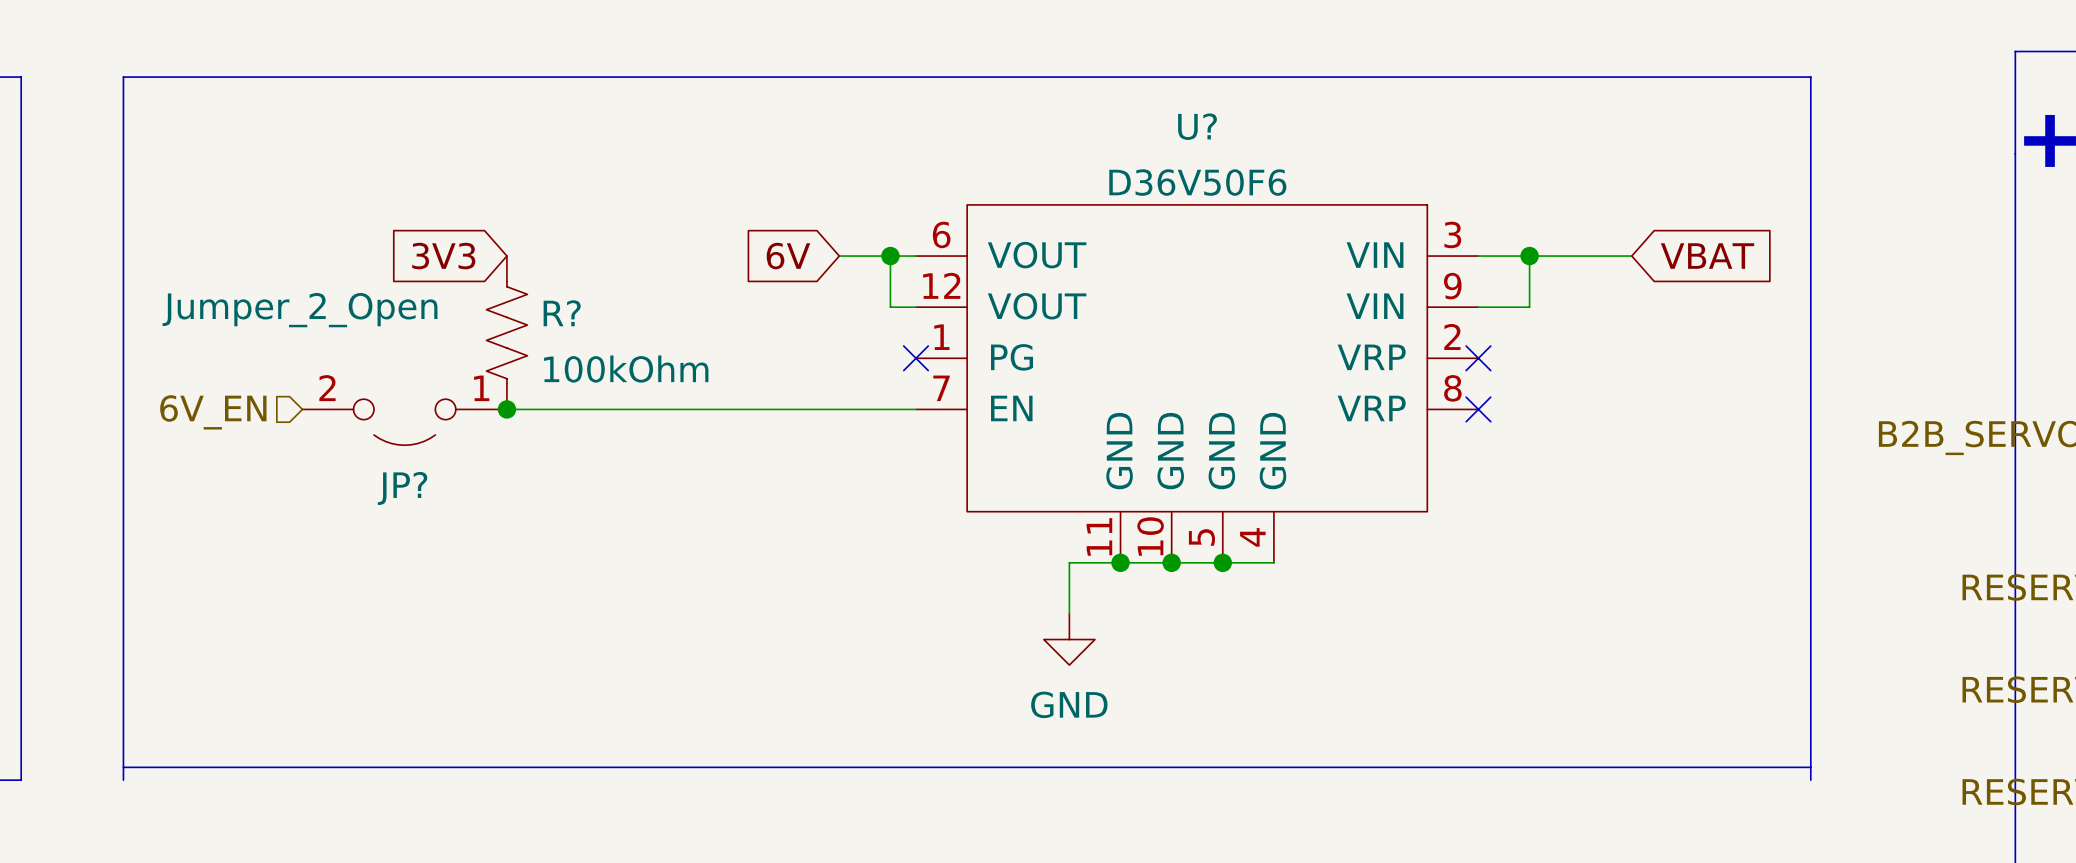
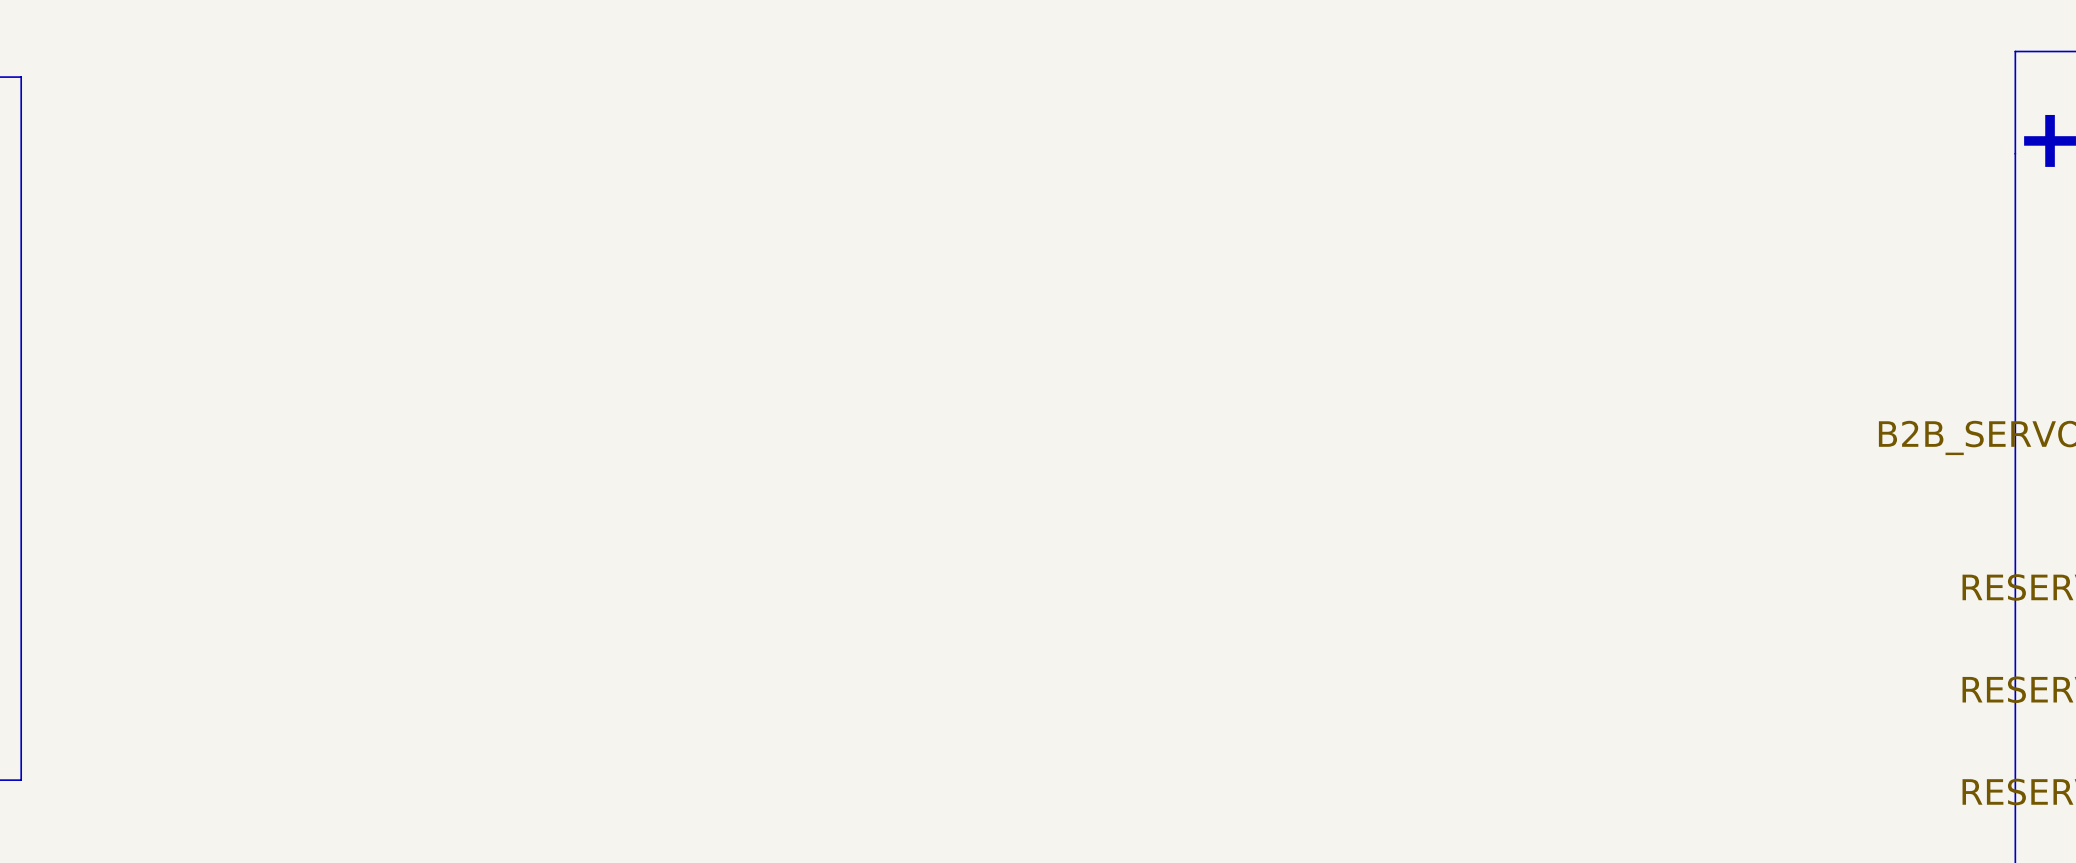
global label: 3V3 (443, 256) -> none
global label: 6V (788, 256) -> none
wire: (839, 256) (916, 256) -> none
wire: (890, 256) (890, 307) (916, 307) -> none
junction: (890, 256) -> none
wire: (1478, 256) (1631, 256) -> none
wire: (1529, 256) (1529, 307) (1478, 307) -> none
junction: (1529, 256) -> none
global label: VBAT (1707, 256) -> none
R?: 100kOhm (506, 332) -> none
no-connect mark: (916, 358) -> none
no-connect mark: (1478, 358) -> none
U?: D36V50F6 (1197, 383) -> none
wire: (506, 409) (916, 409) -> none
junction: (506, 409) -> none
no-connect mark: (1478, 409) -> none
hierarchical label: 6V_EN (213, 412) -> none
JP?: Jumper_2_Open (404, 422) -> none
junction: (1120, 562) -> none
junction: (1171, 562) -> none
junction: (1222, 562) -> none
wire: (1273, 562) (1069, 562) (1069, 613) -> none
power symbol: GND (1069, 639) -> none
line: (123, 767) (1810, 767) -> none
line: (123, 780) (123, 77) (1810, 77) (1810, 780) -> none

